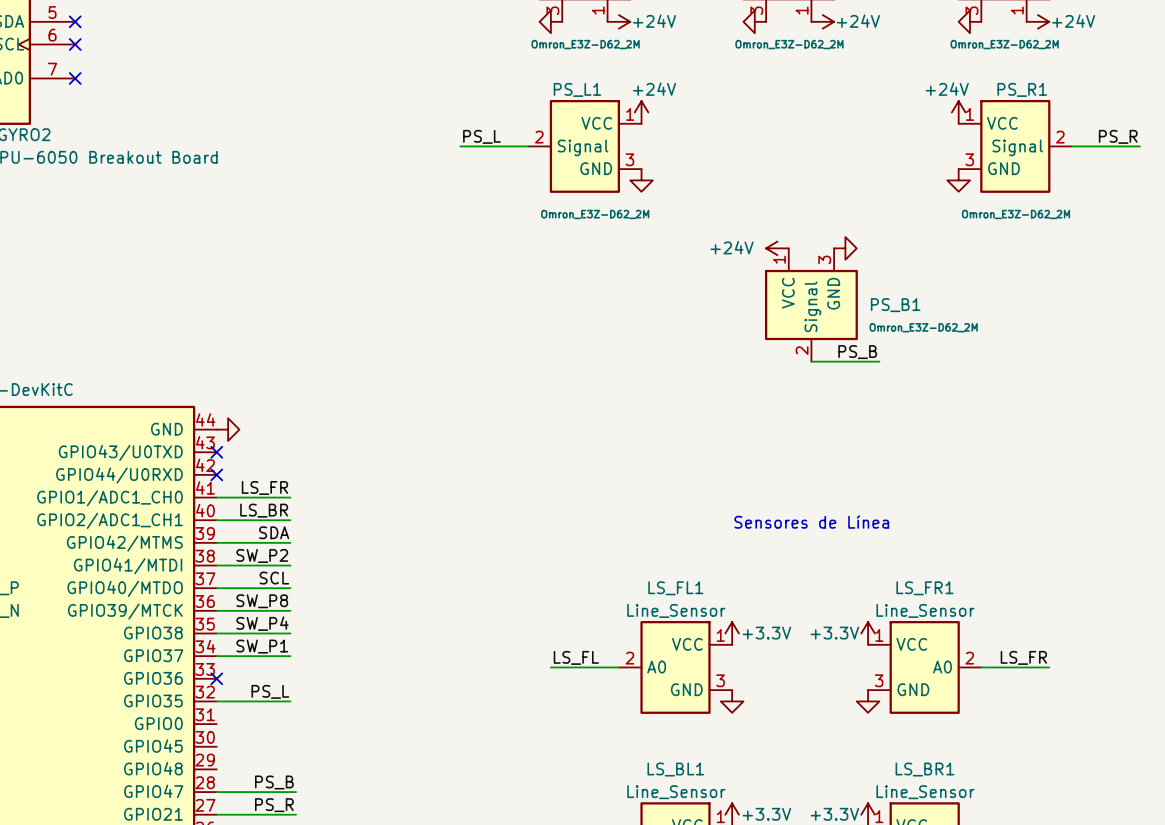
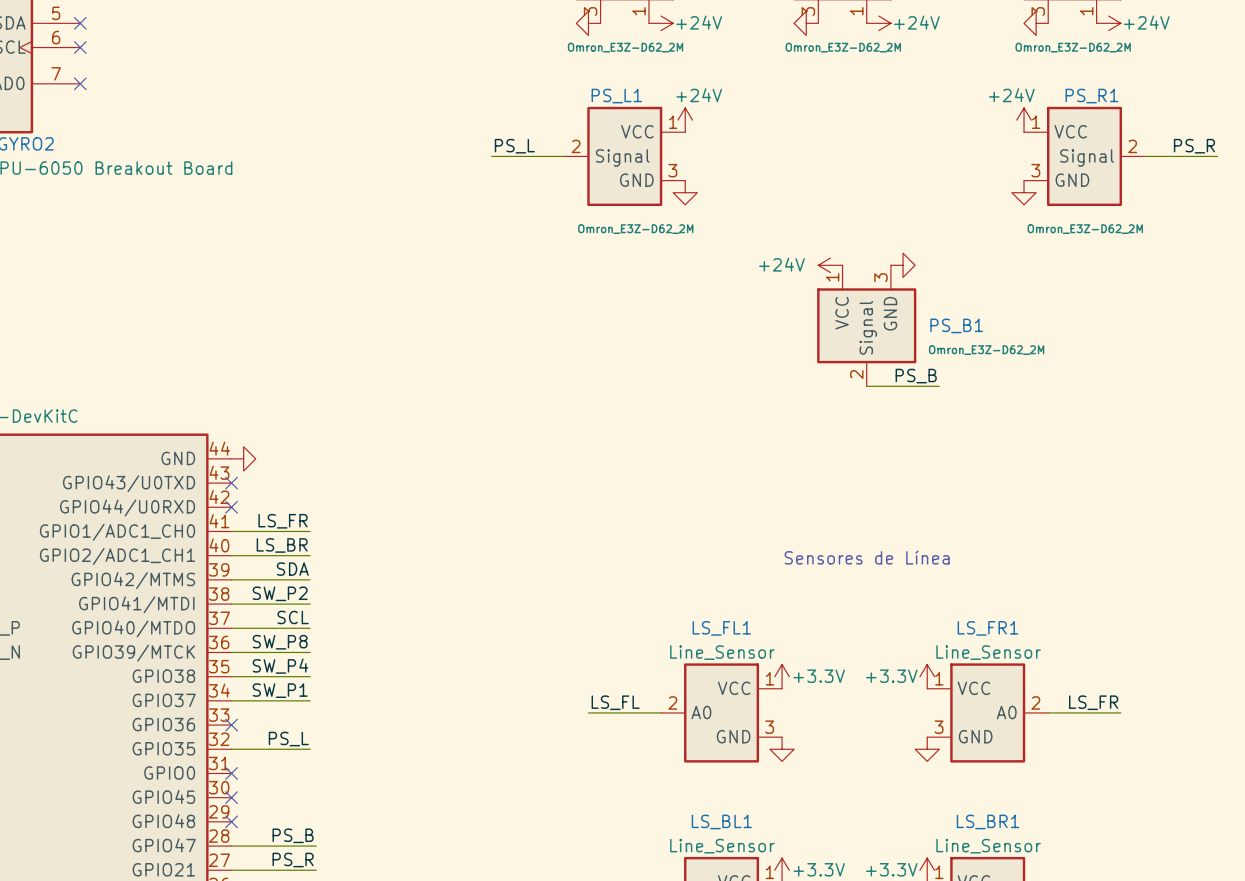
no-connect mark: none -> (231, 773)
no-connect mark: none -> (231, 797)
no-connect mark: none -> (231, 821)

